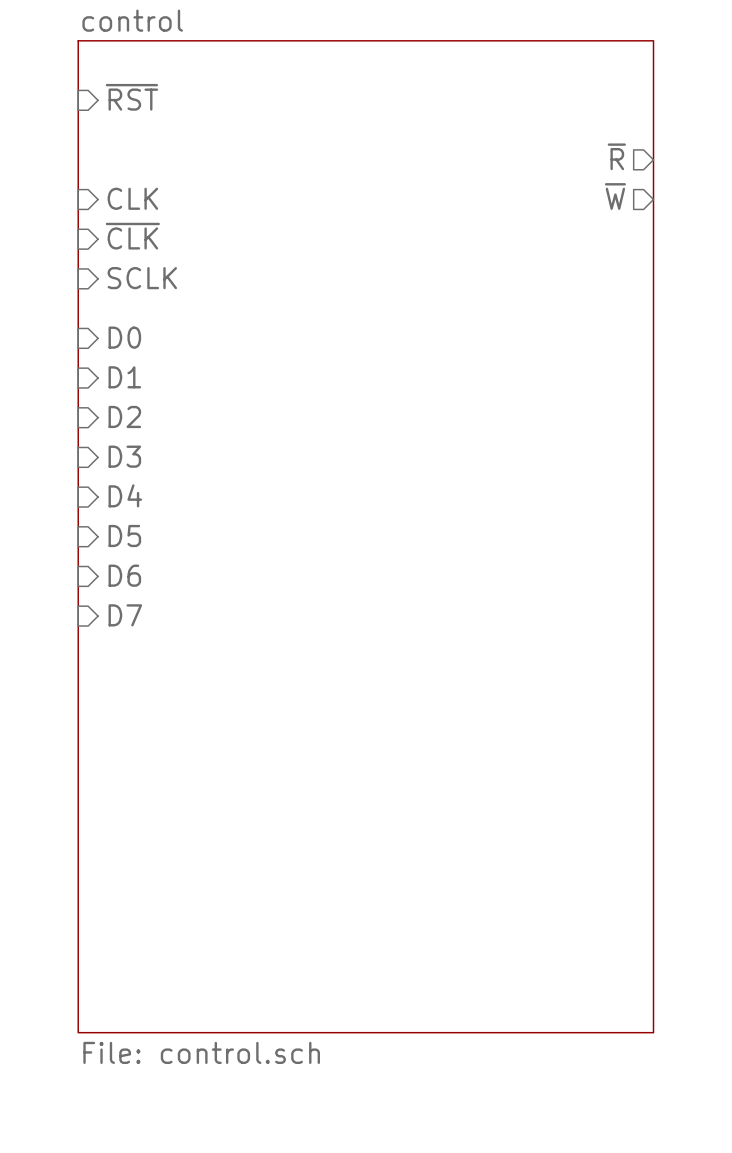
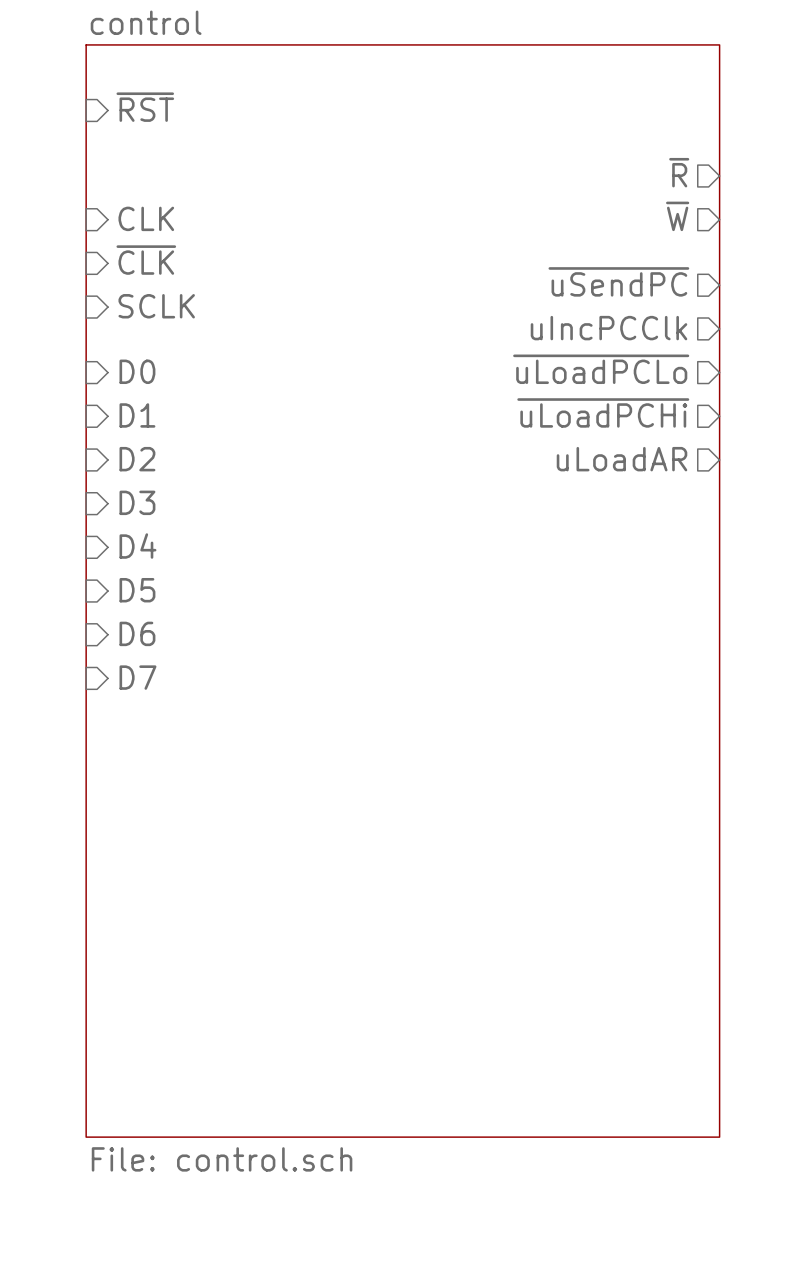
sheet pin: none -> ~{uSendPC} (618, 281)
sheet pin: none -> uIncPCClk (609, 328)
sheet pin: none -> ~{uLoadPCLo} (601, 369)
sheet pin: none -> ~{uLoadPCHi} (603, 412)
sheet pin: none -> uLoadAR (622, 459)

